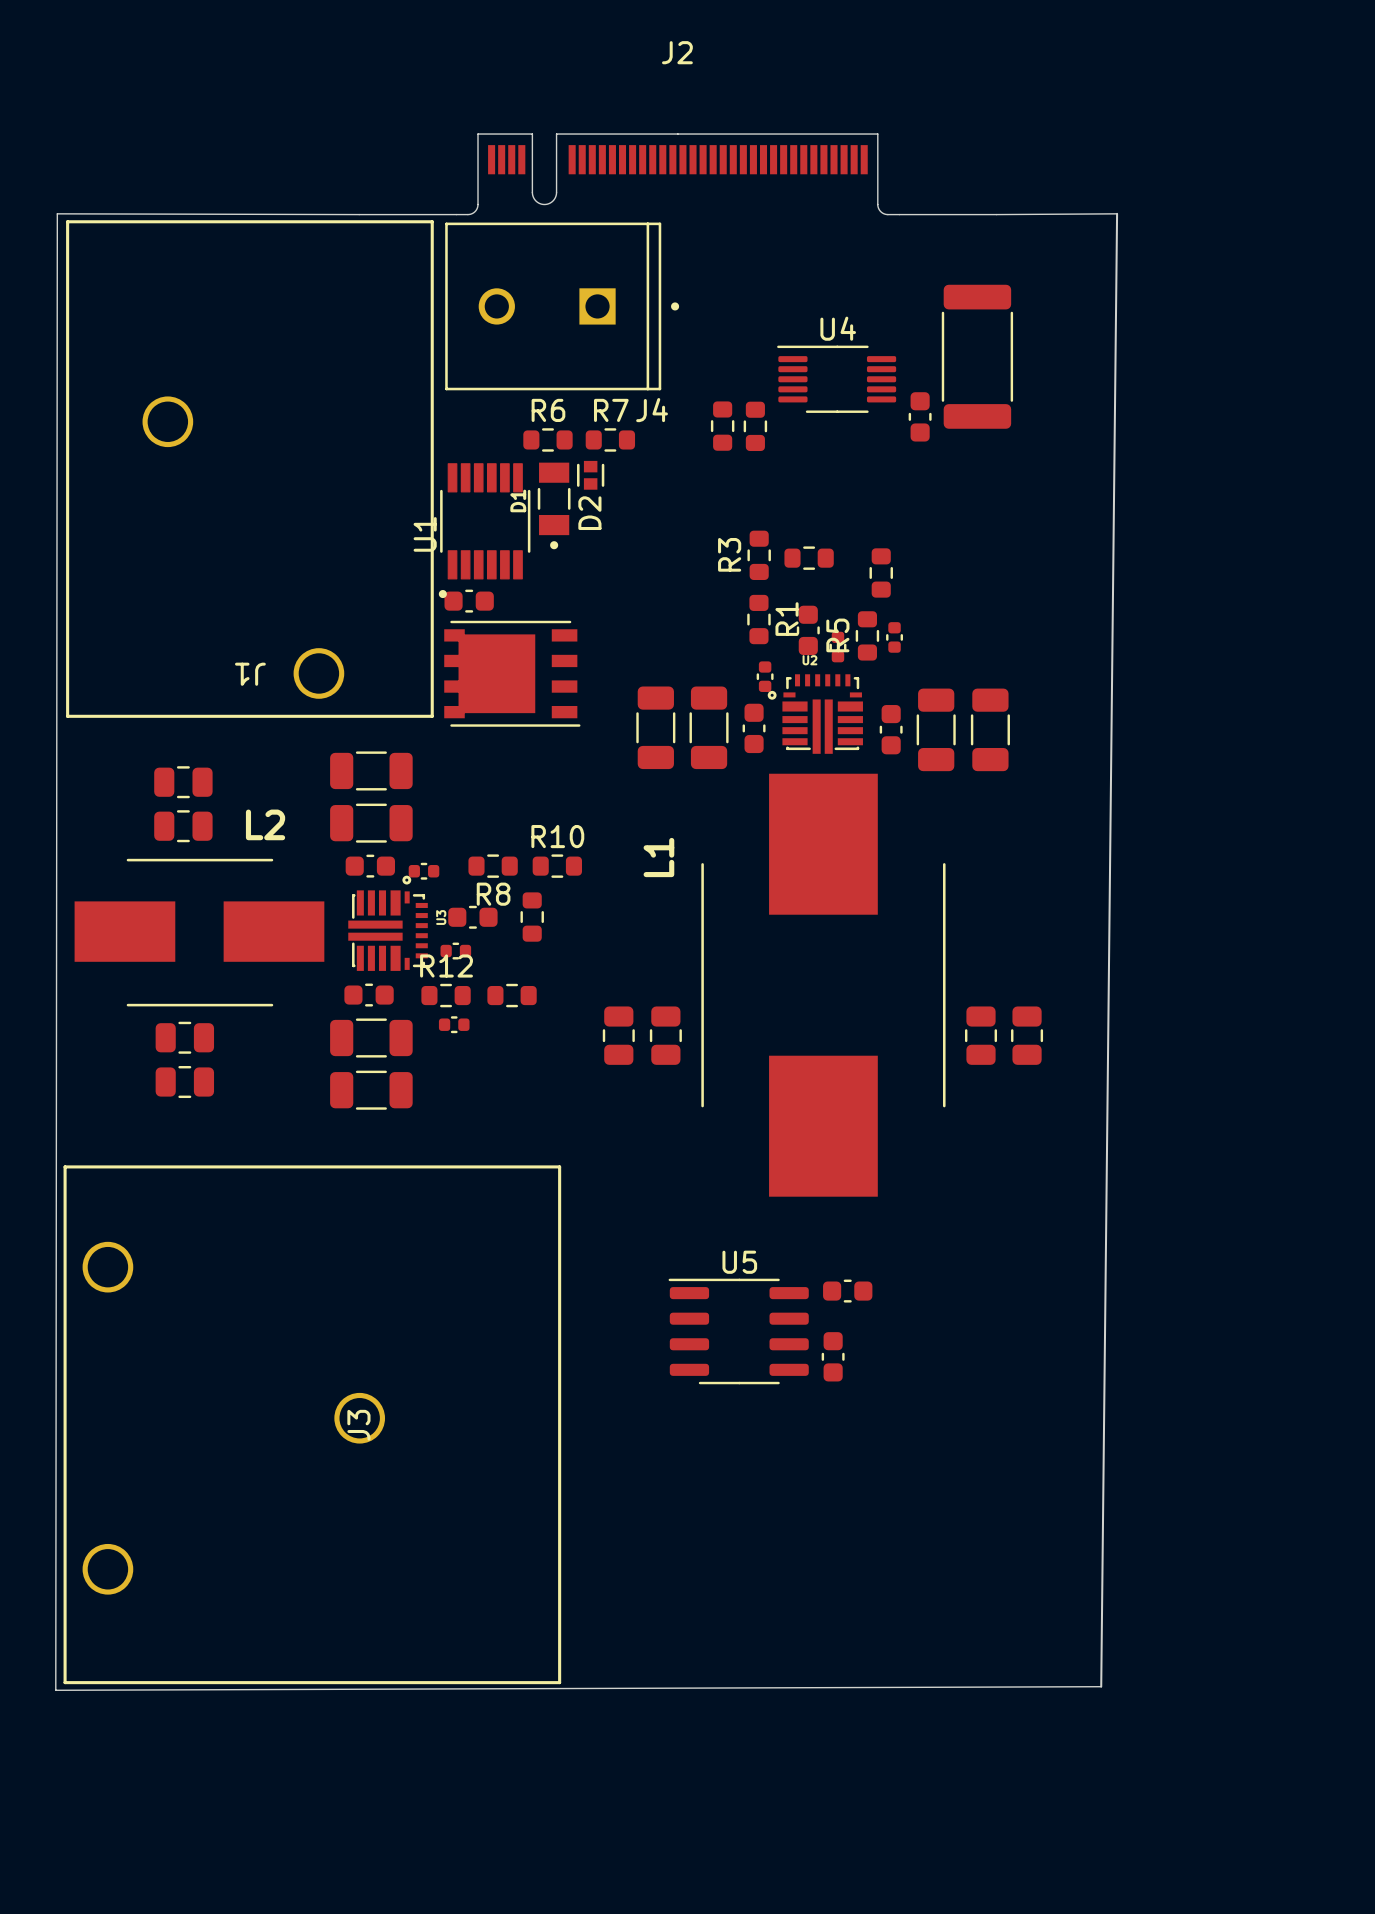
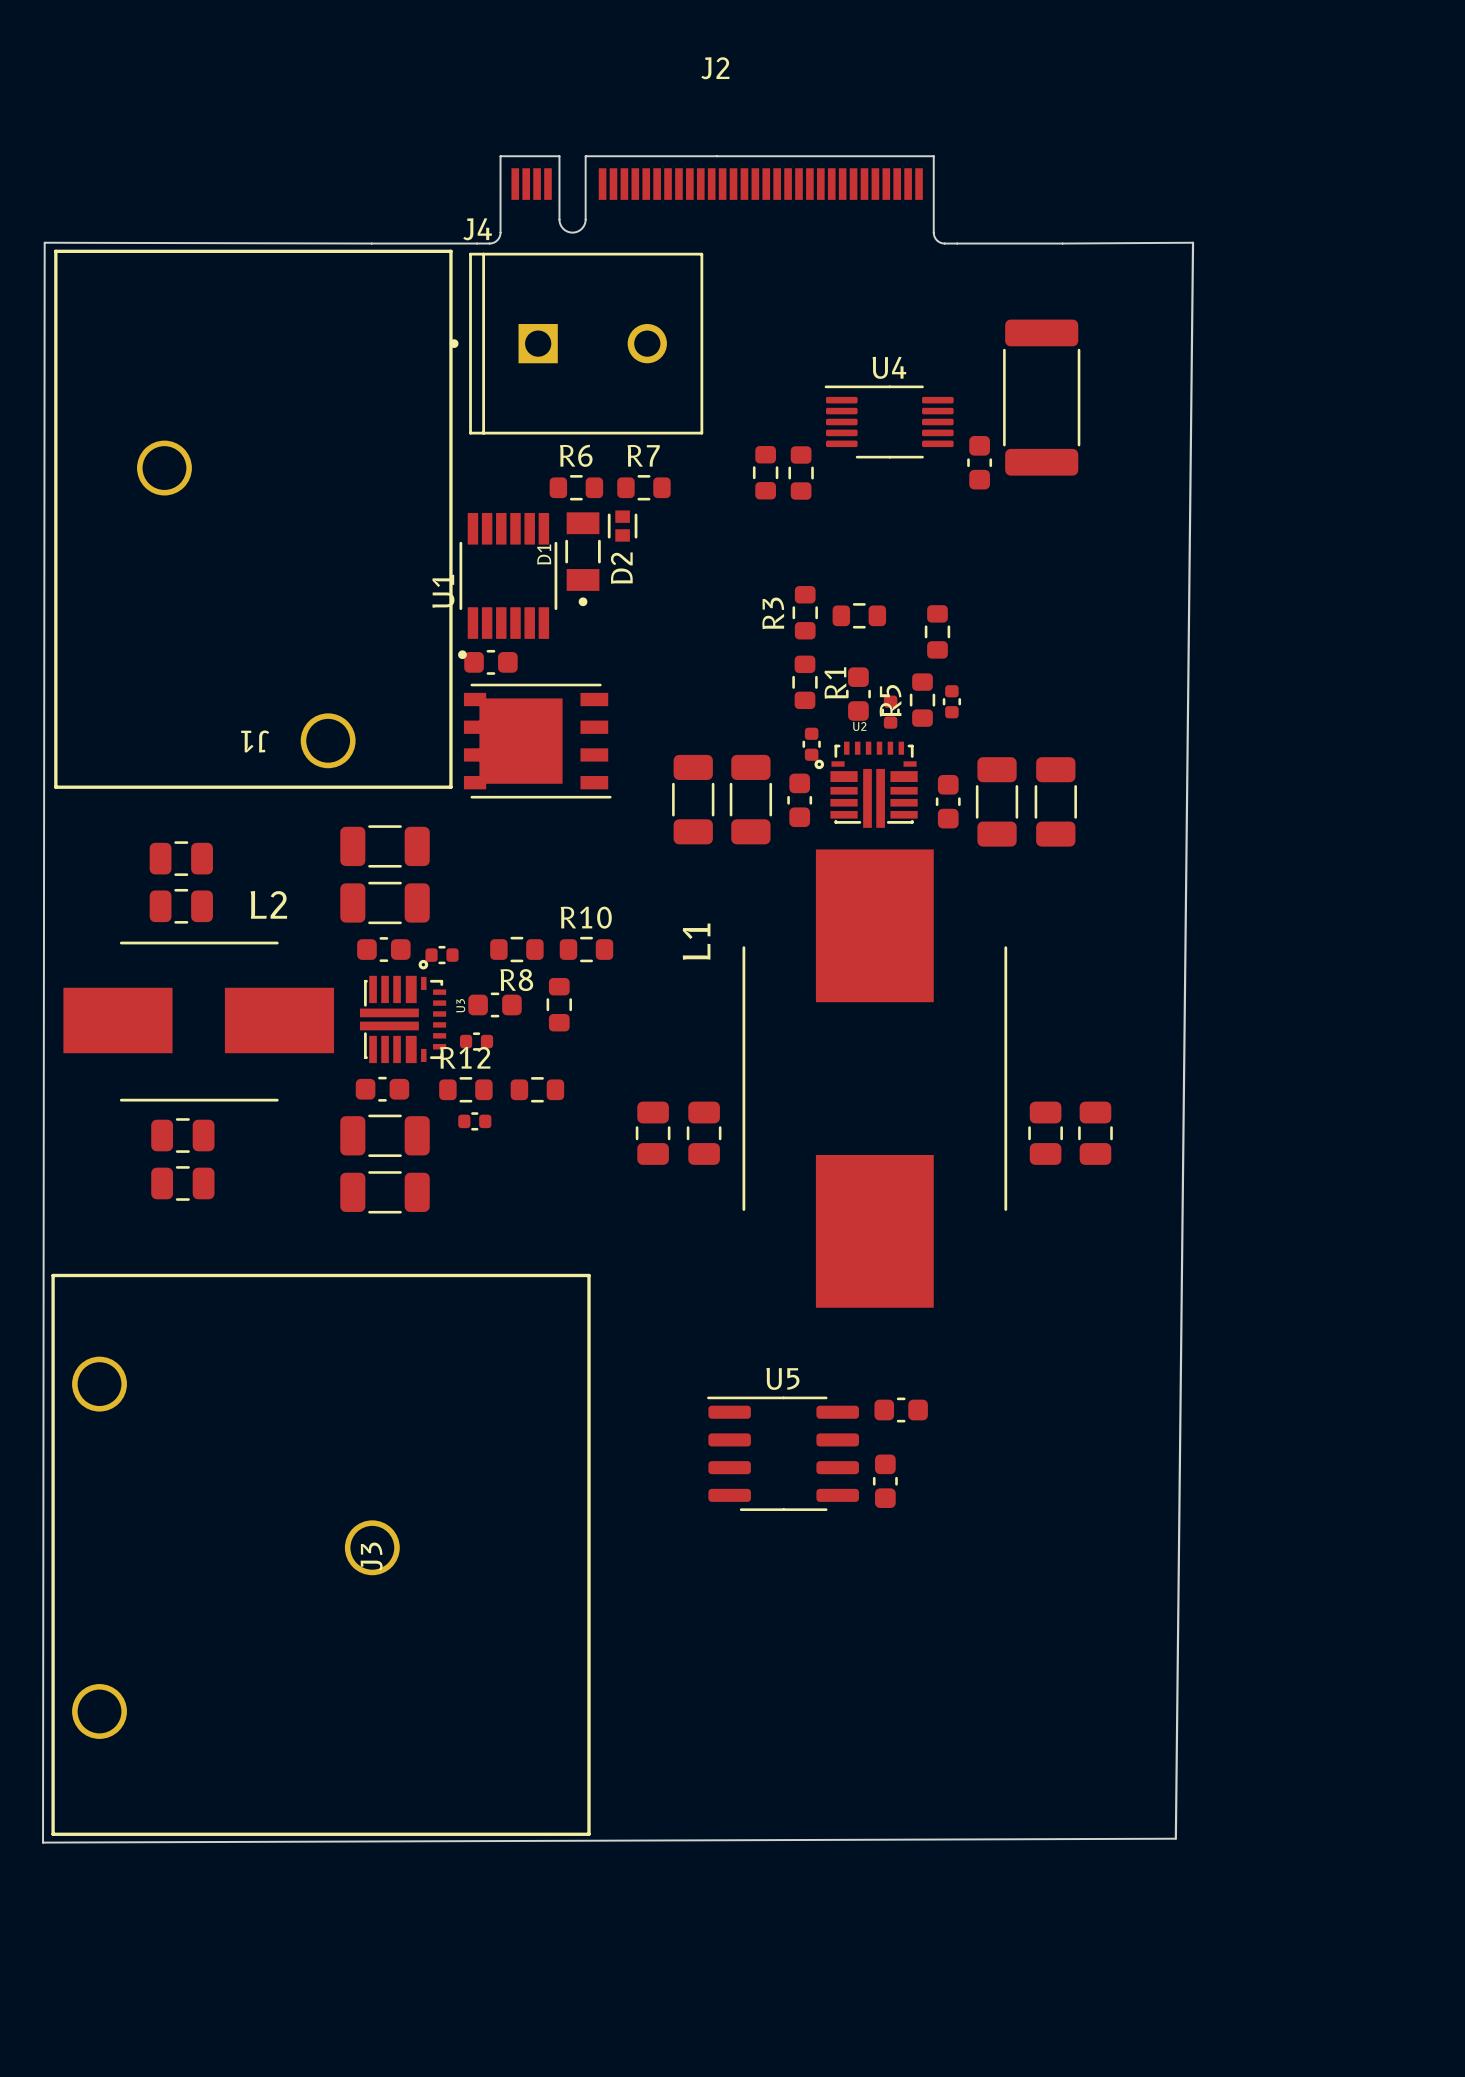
J4 rotation: 0° (562, 306) -> 180° (576, 343)

